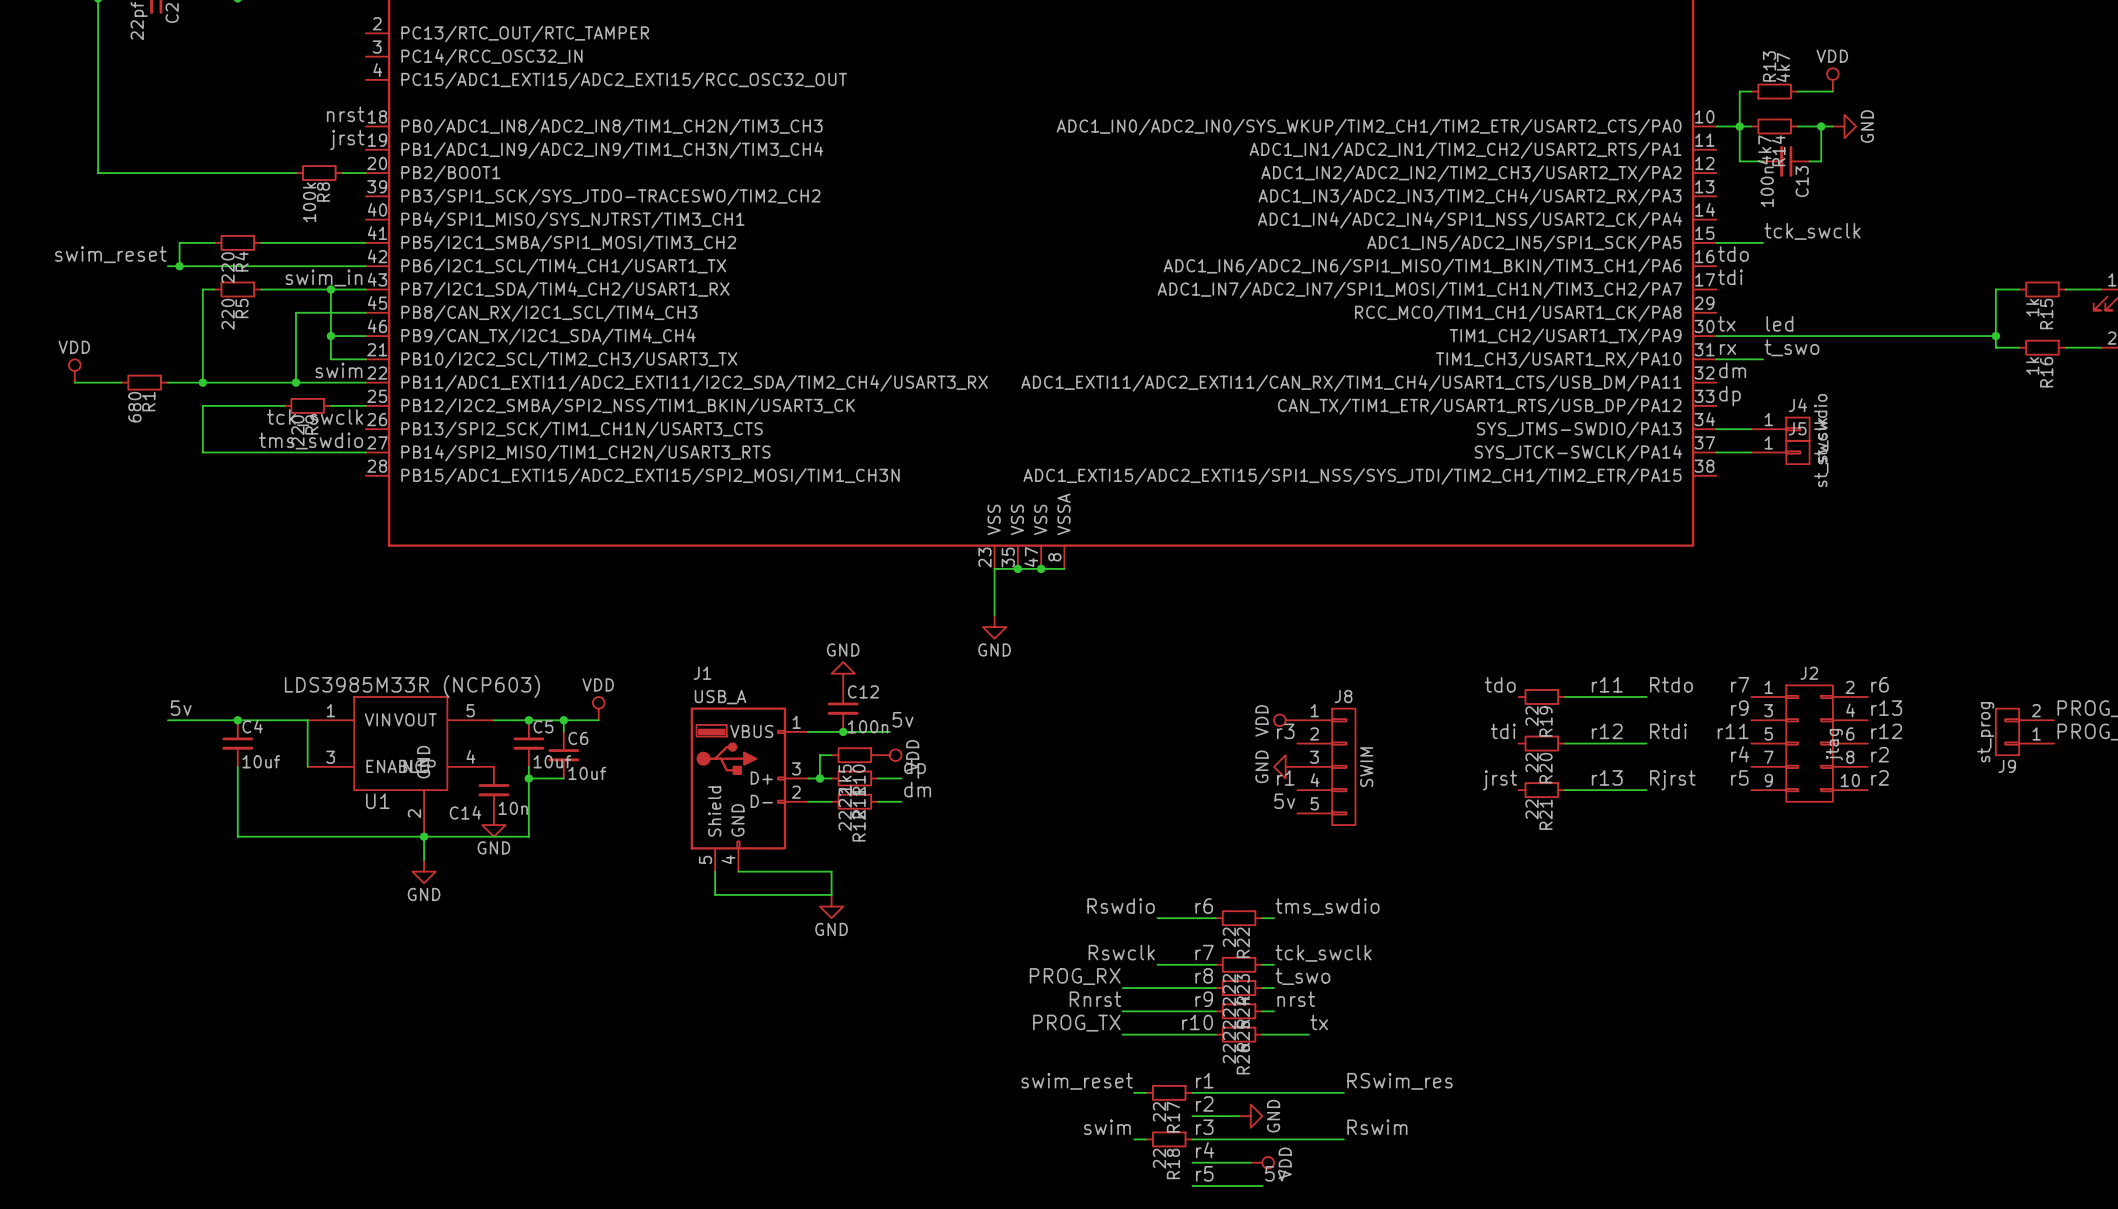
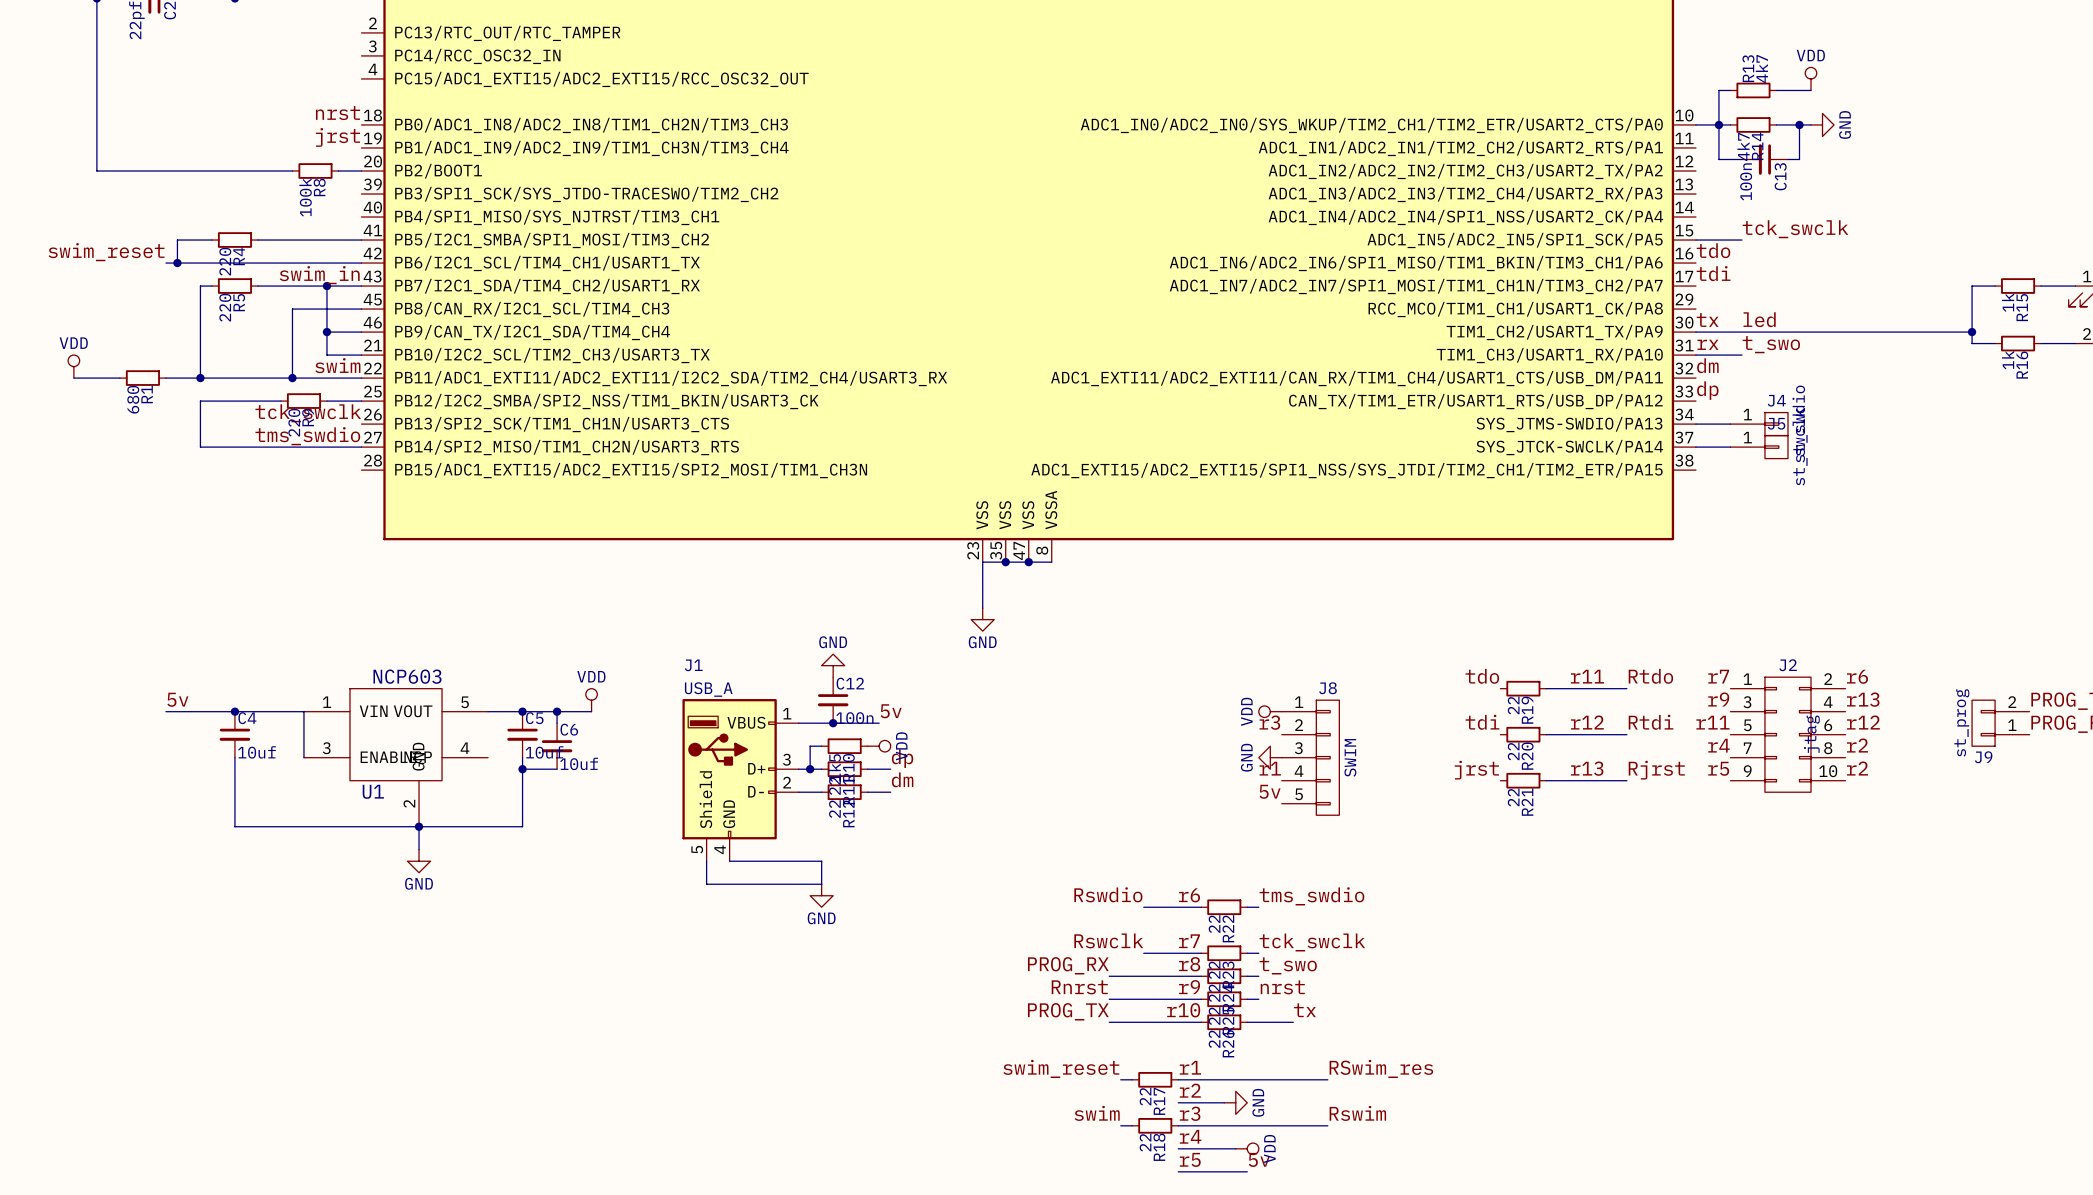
U1 value: LDS3985M33R (NCP603) (412, 686) -> NCP603 (407, 676)
C14: 10n (493, 790) -> none
power symbol: GND (493, 825) -> none

